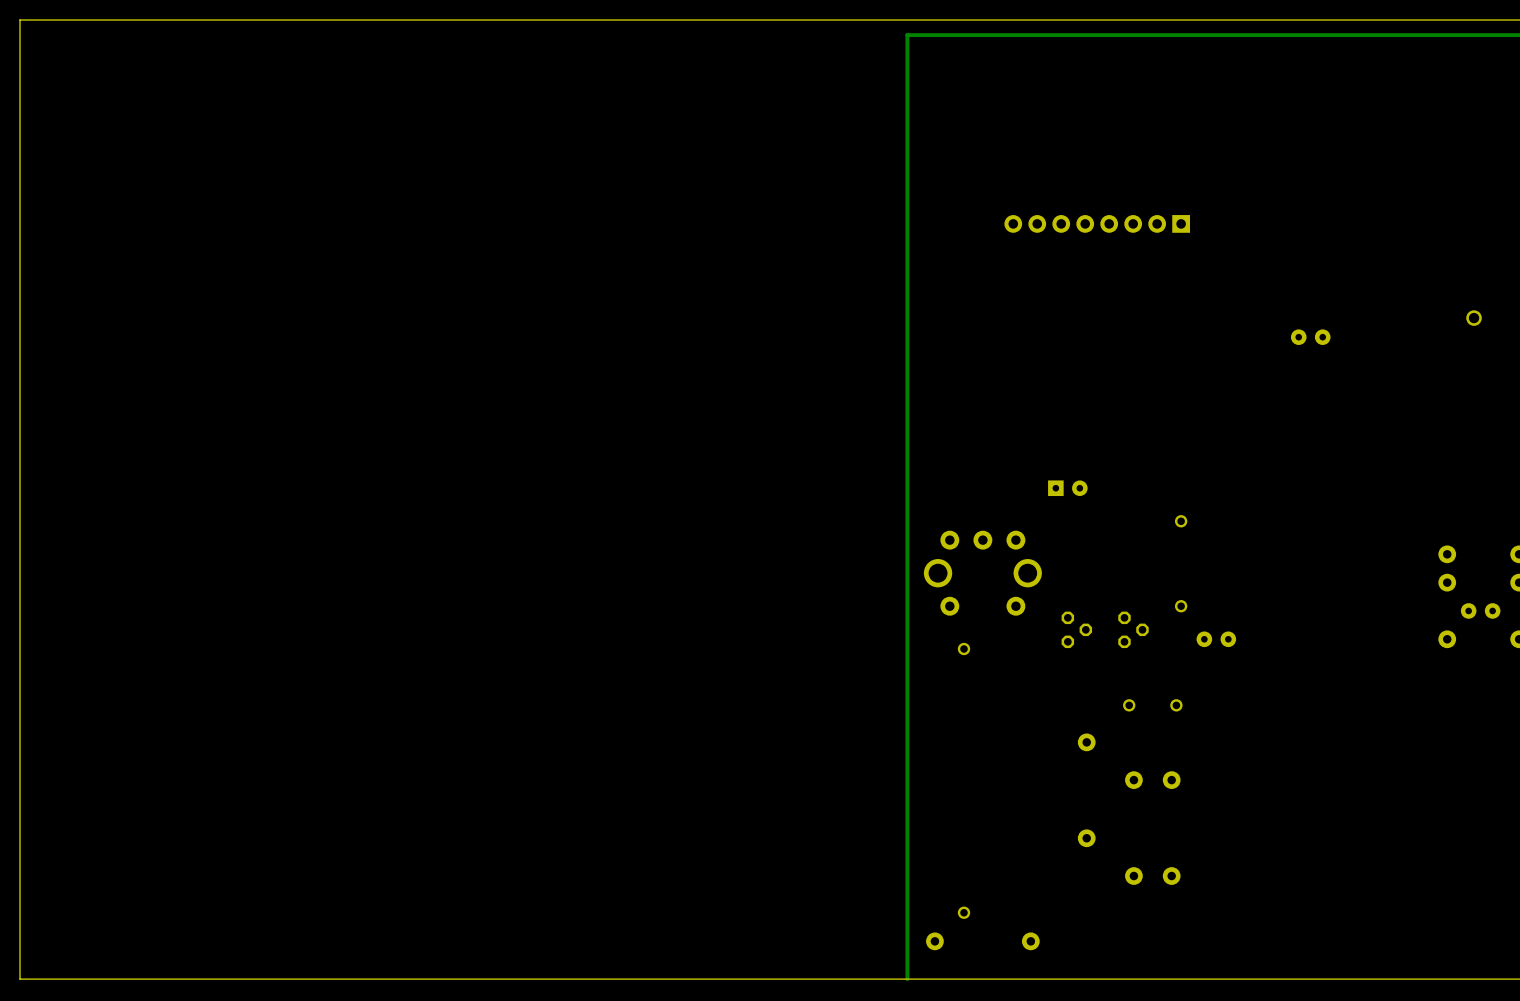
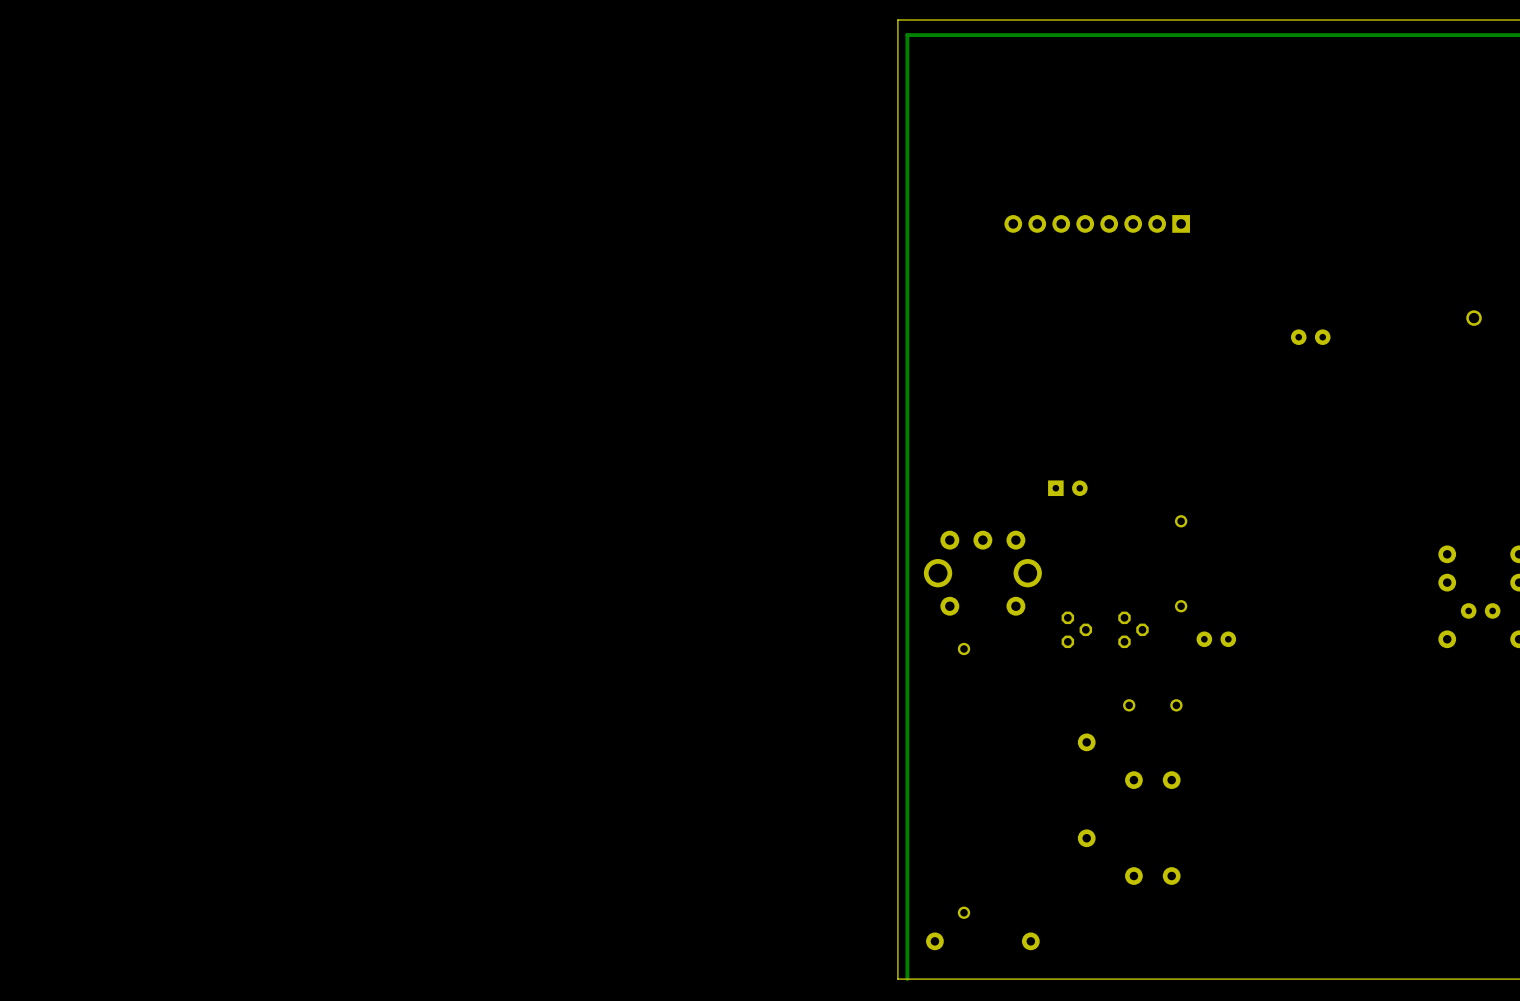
board edge: (897, 20) (20, 20) (20, 979) (897, 979) -> (897, 20) (897, 979)

